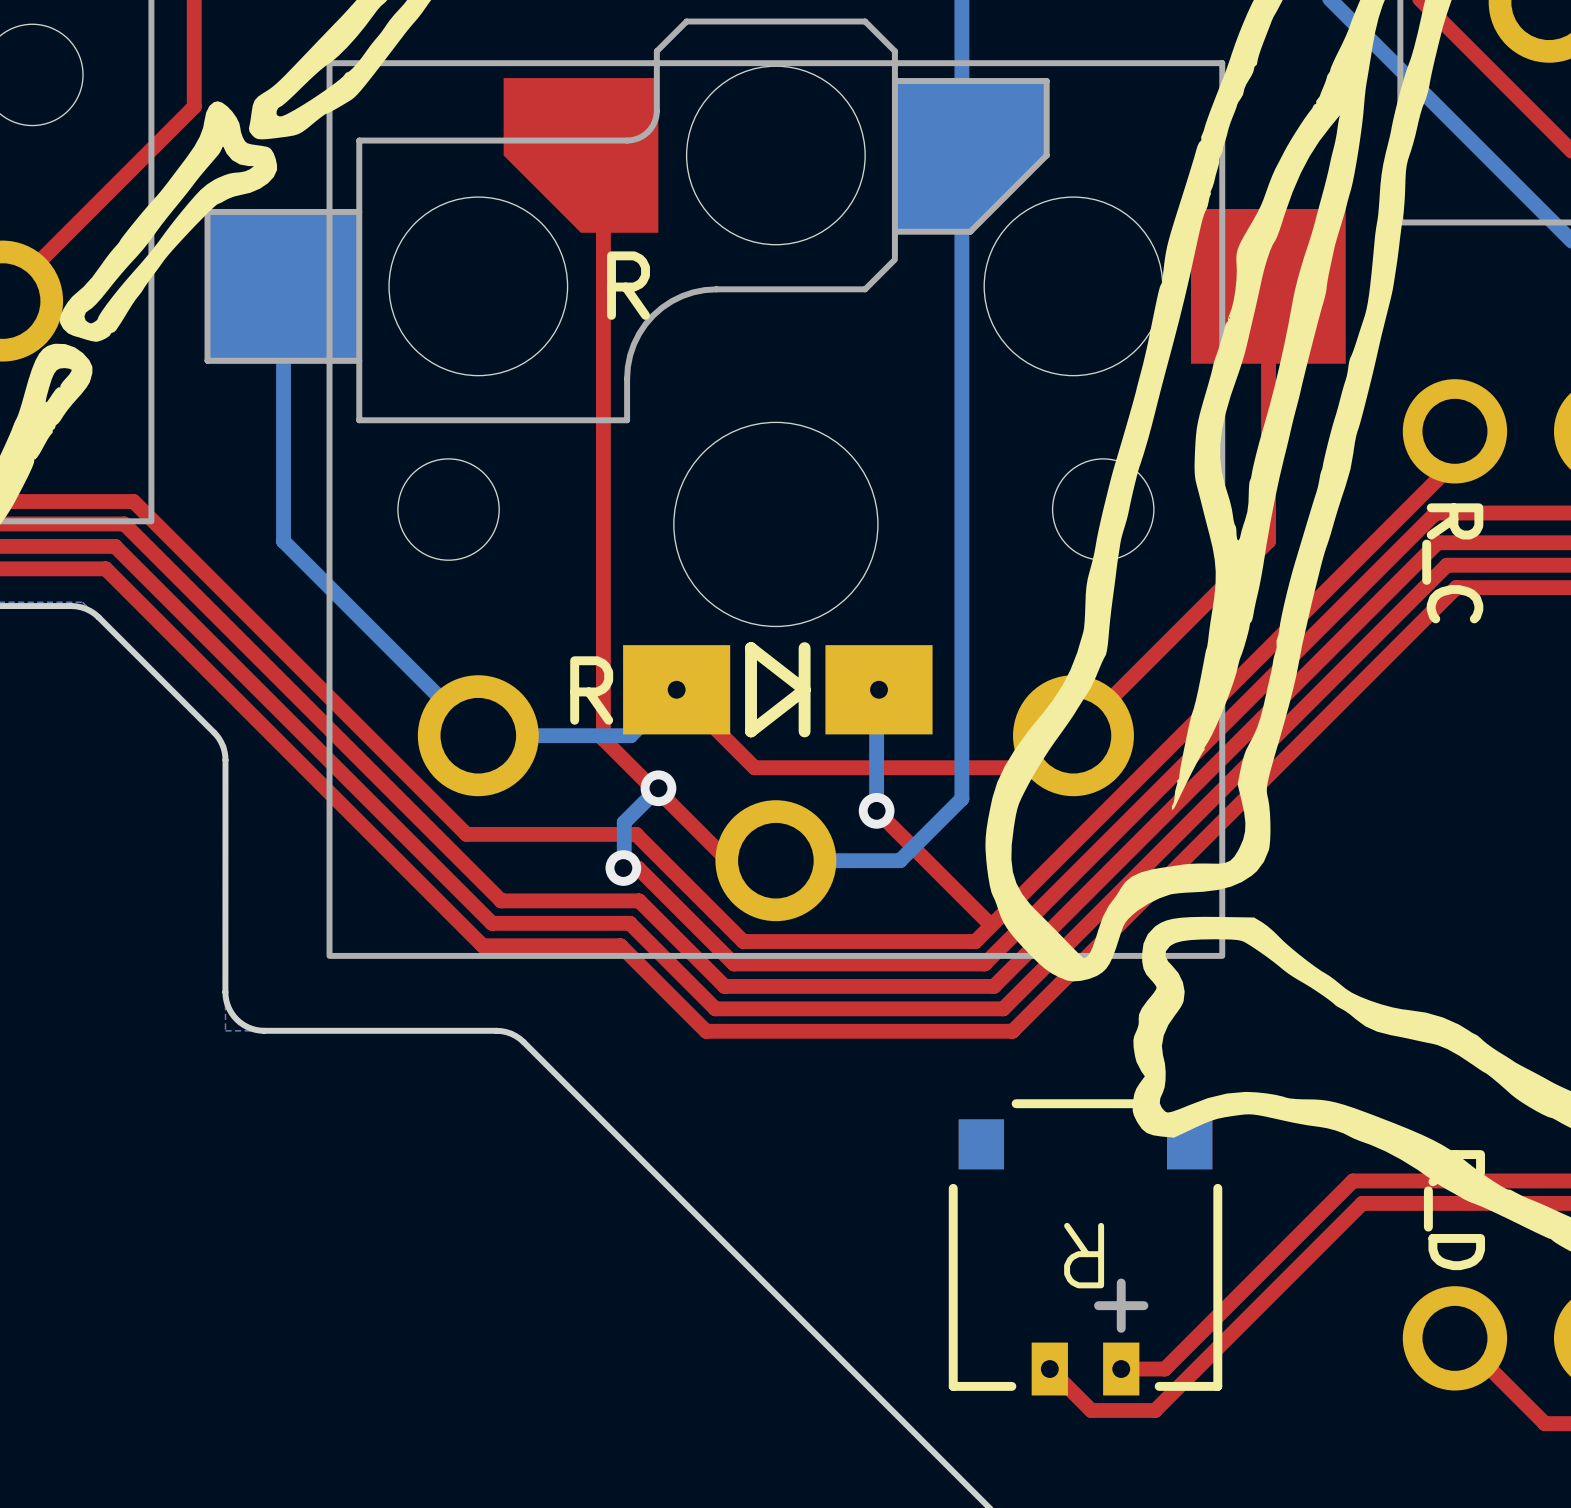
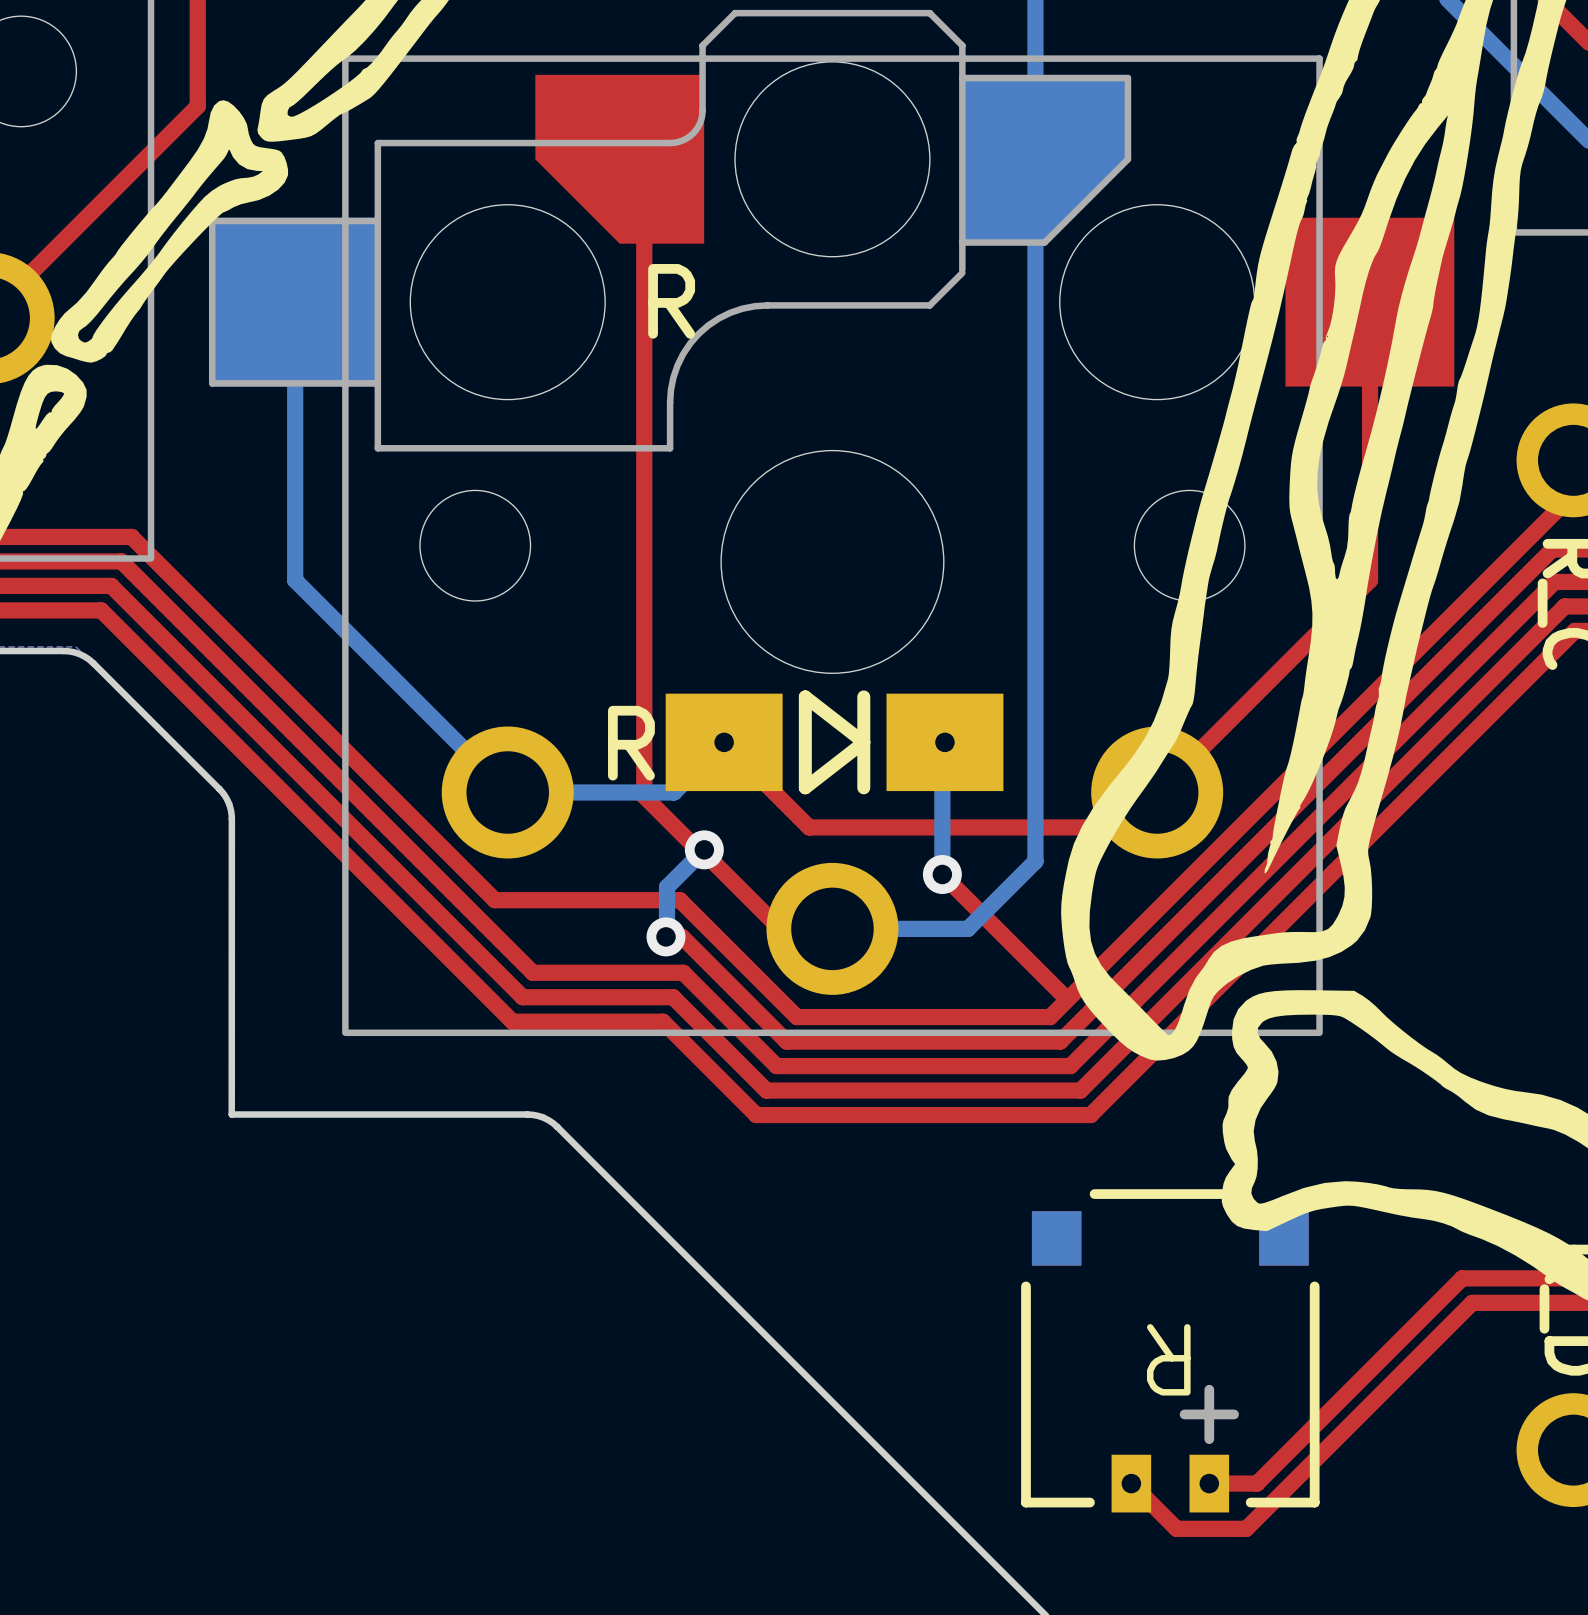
board edge: (225, 992) (227, 1004) (236, 1019) (251, 1028) (264, 1030) -> (231, 1072) (231, 1114) (273, 1114)

